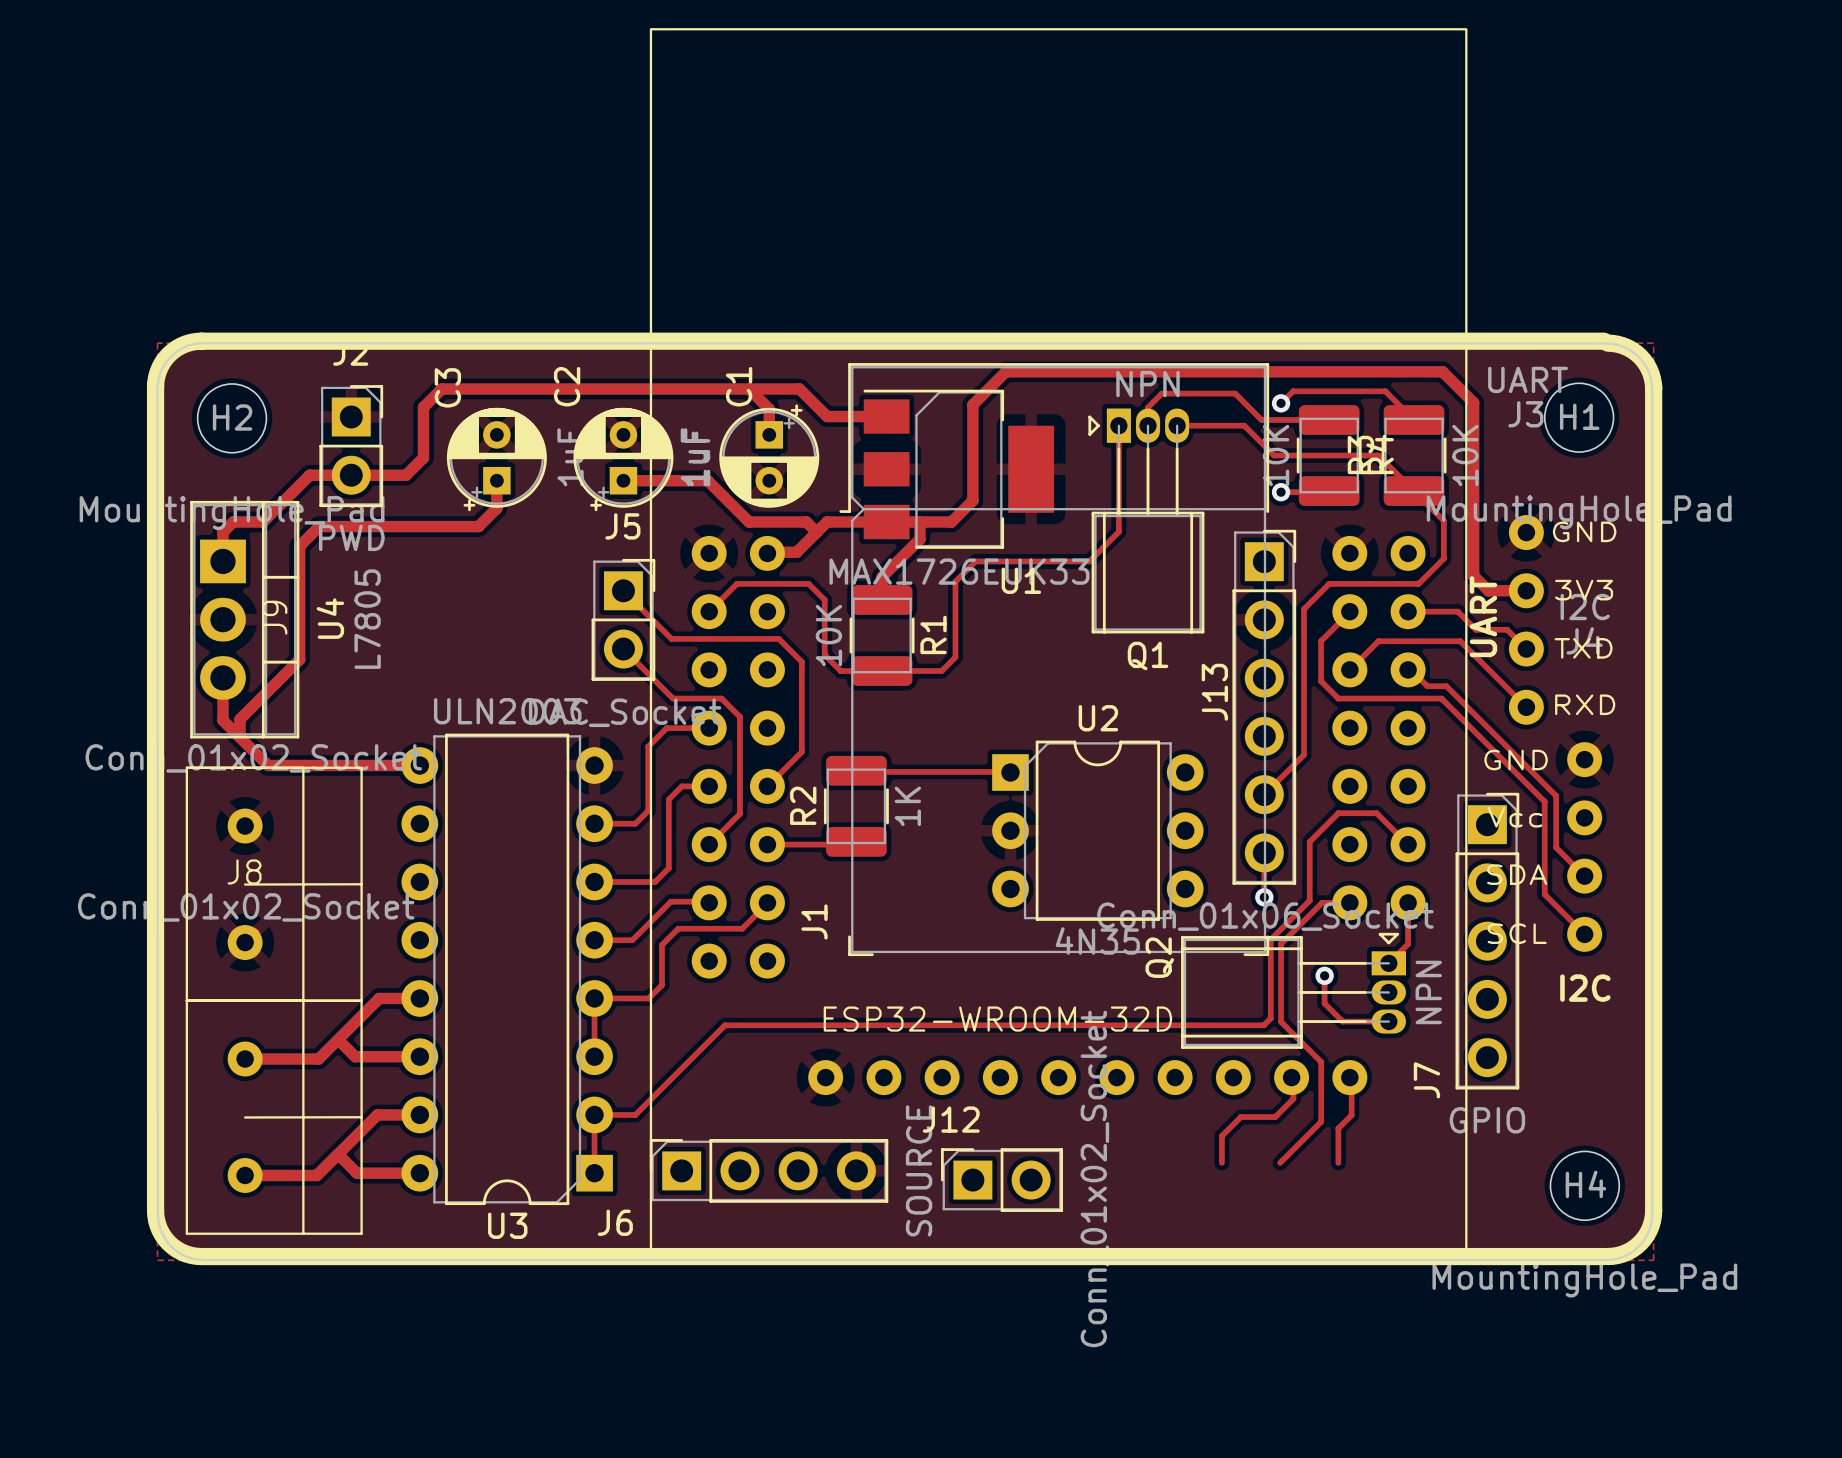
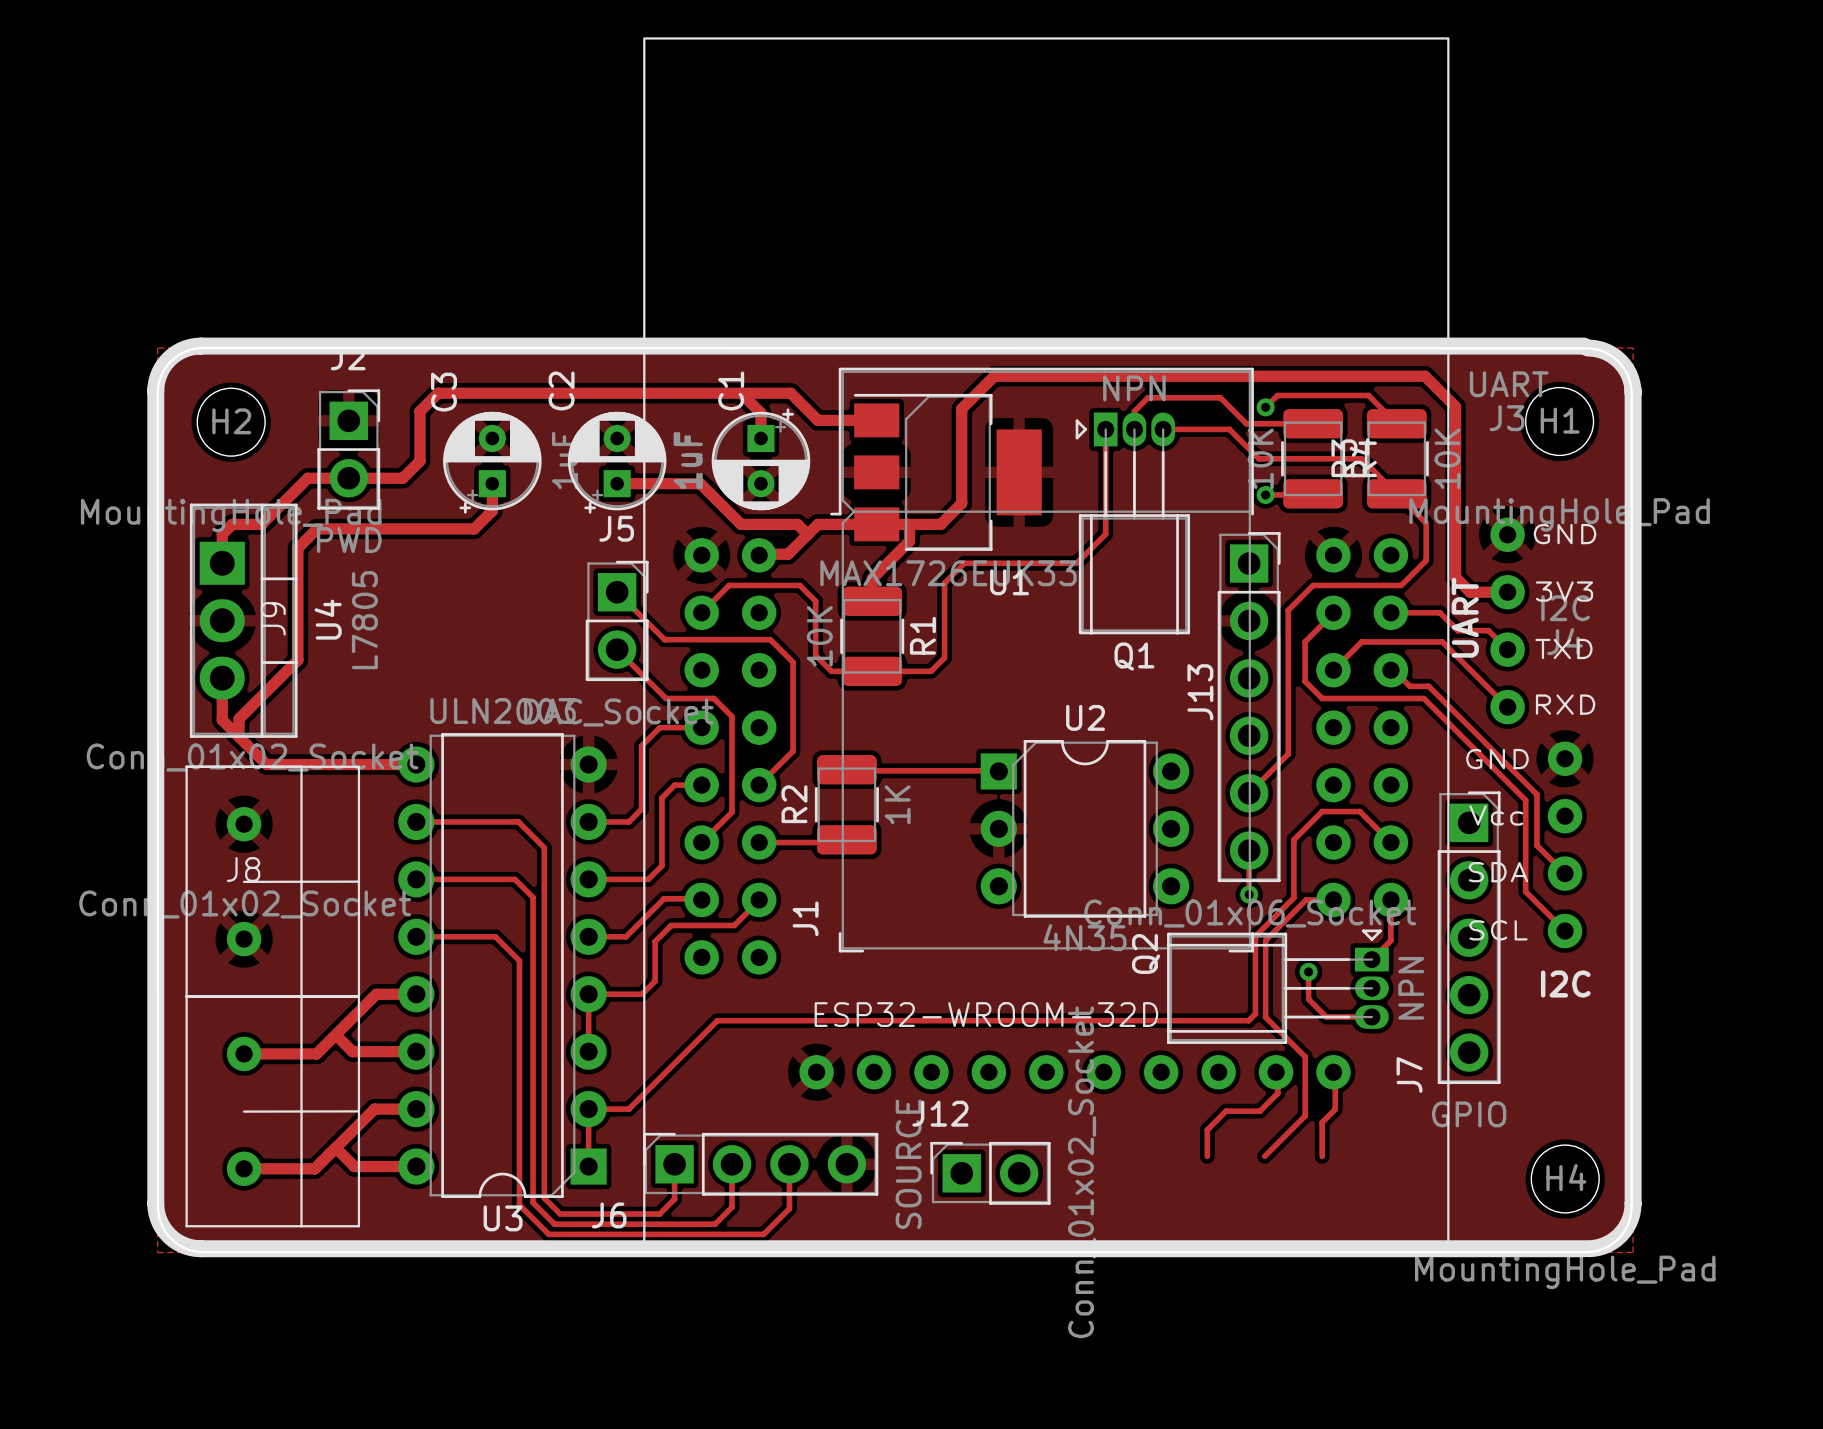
track: none -> (416, 821) (518, 821) (544, 847) (544, 1198) (560, 1214) (659, 1214) (674, 1199) (674, 1164)
track: none -> (416, 879) (514, 879) (533, 897) (533, 1202) (554, 1224) (715, 1224) (732, 1207) (732, 1164)
track: none -> (416, 936) (495, 936) (519, 960) (519, 1204) (548, 1234) (763, 1234) (789, 1208) (789, 1164)

